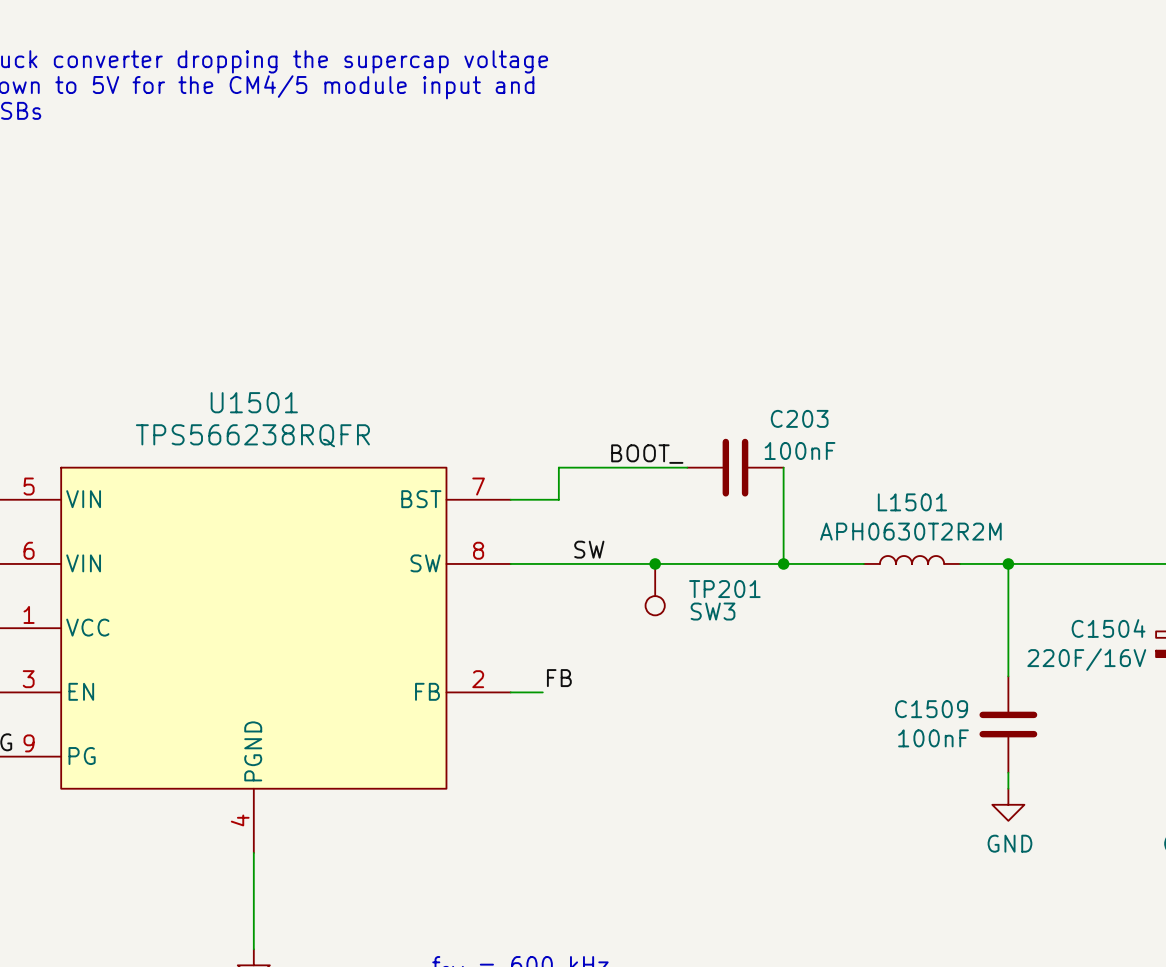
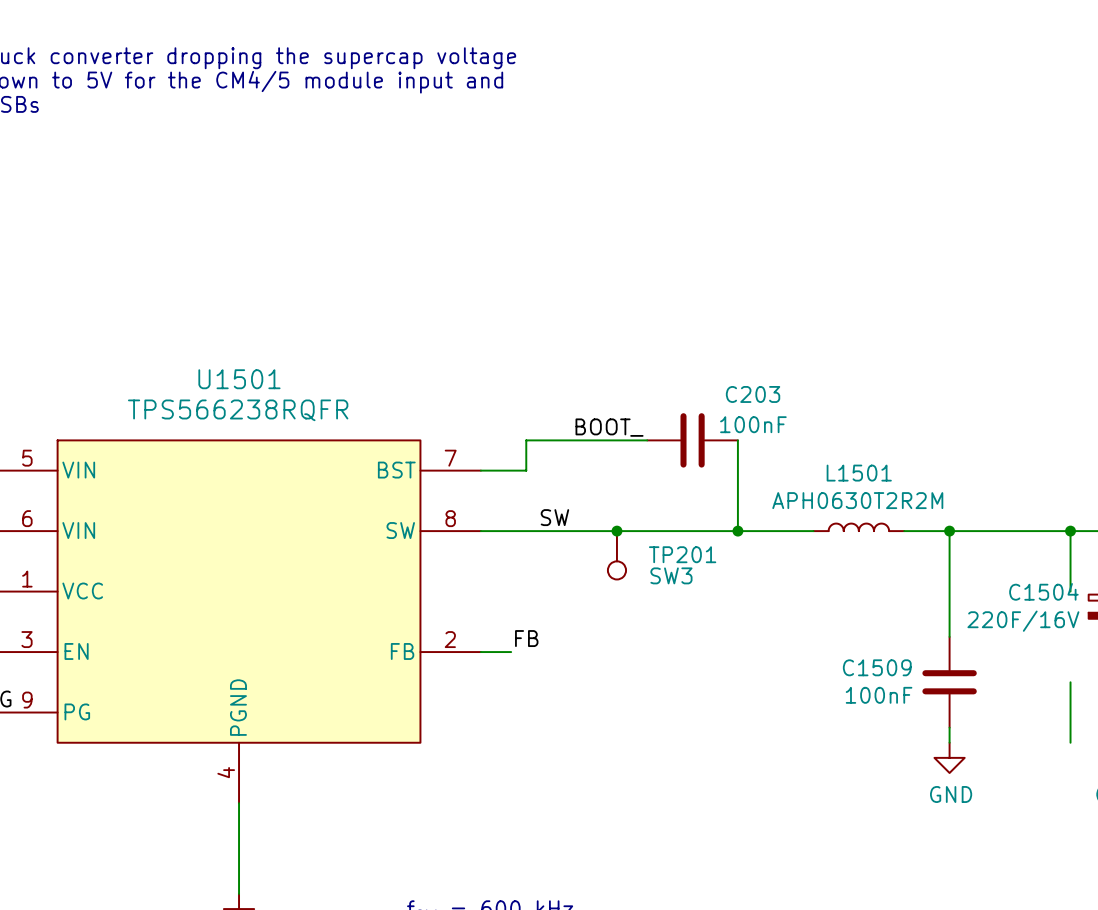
wire: none -> (1070, 531) (1070, 591)
junction: none -> (1070, 531)
wire: none -> (1070, 682) (1070, 742)

